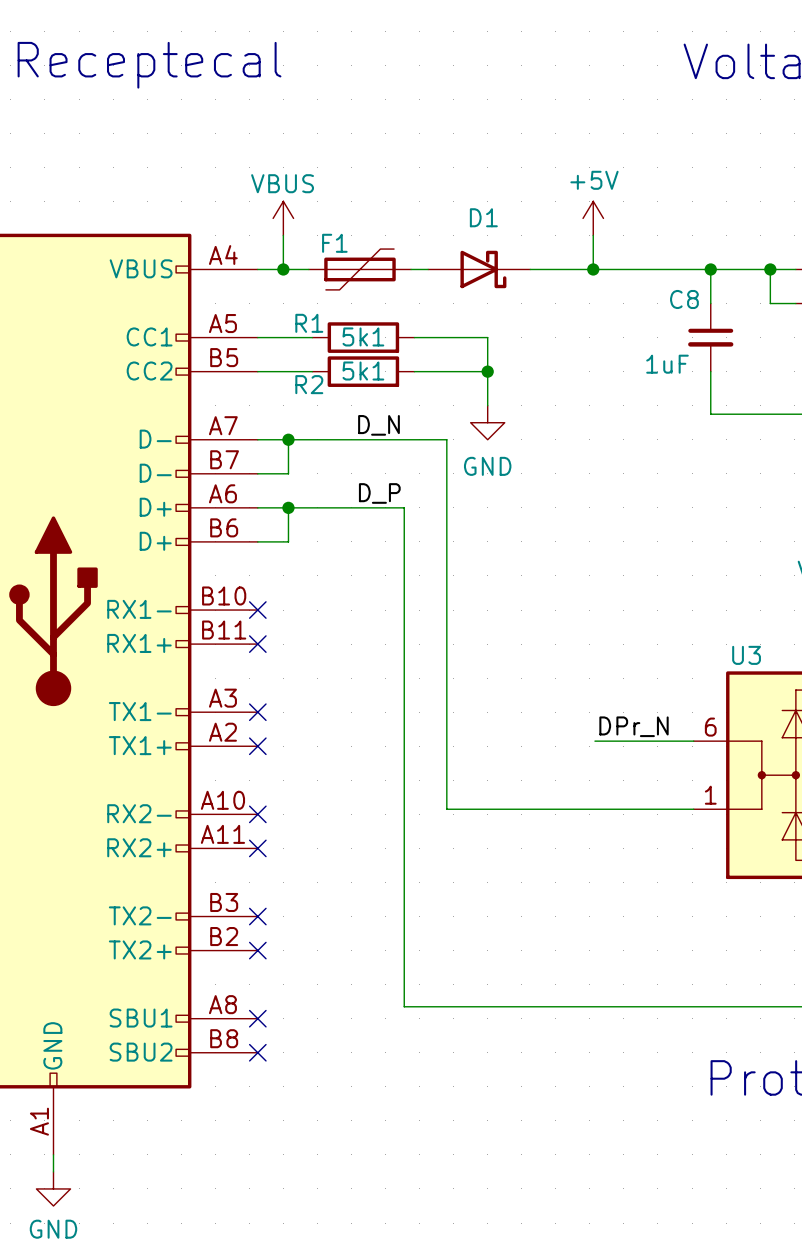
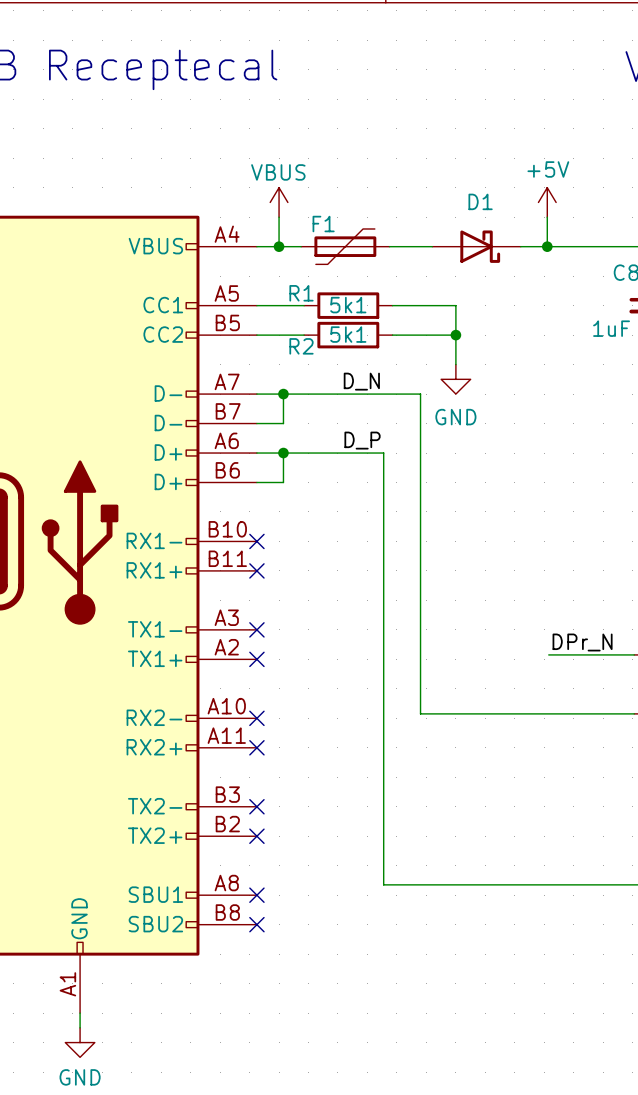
D1 position: (479, 269) -> (476, 246)

